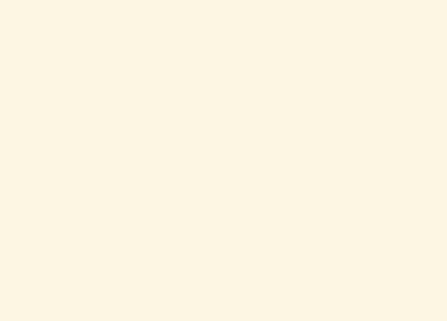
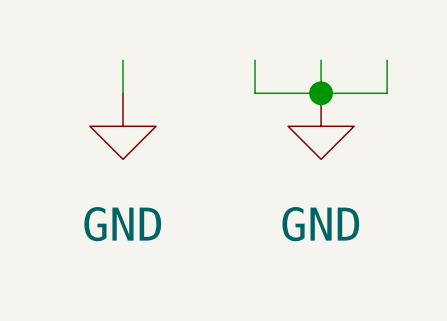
wire: none -> (122, 60) (122, 93)
wire: none -> (255, 60) (255, 93) (387, 93) (387, 60)
wire: none -> (321, 60) (321, 93)
junction: none -> (321, 93)
power symbol: none -> GND (122, 126)
power symbol: none -> GND (321, 126)

